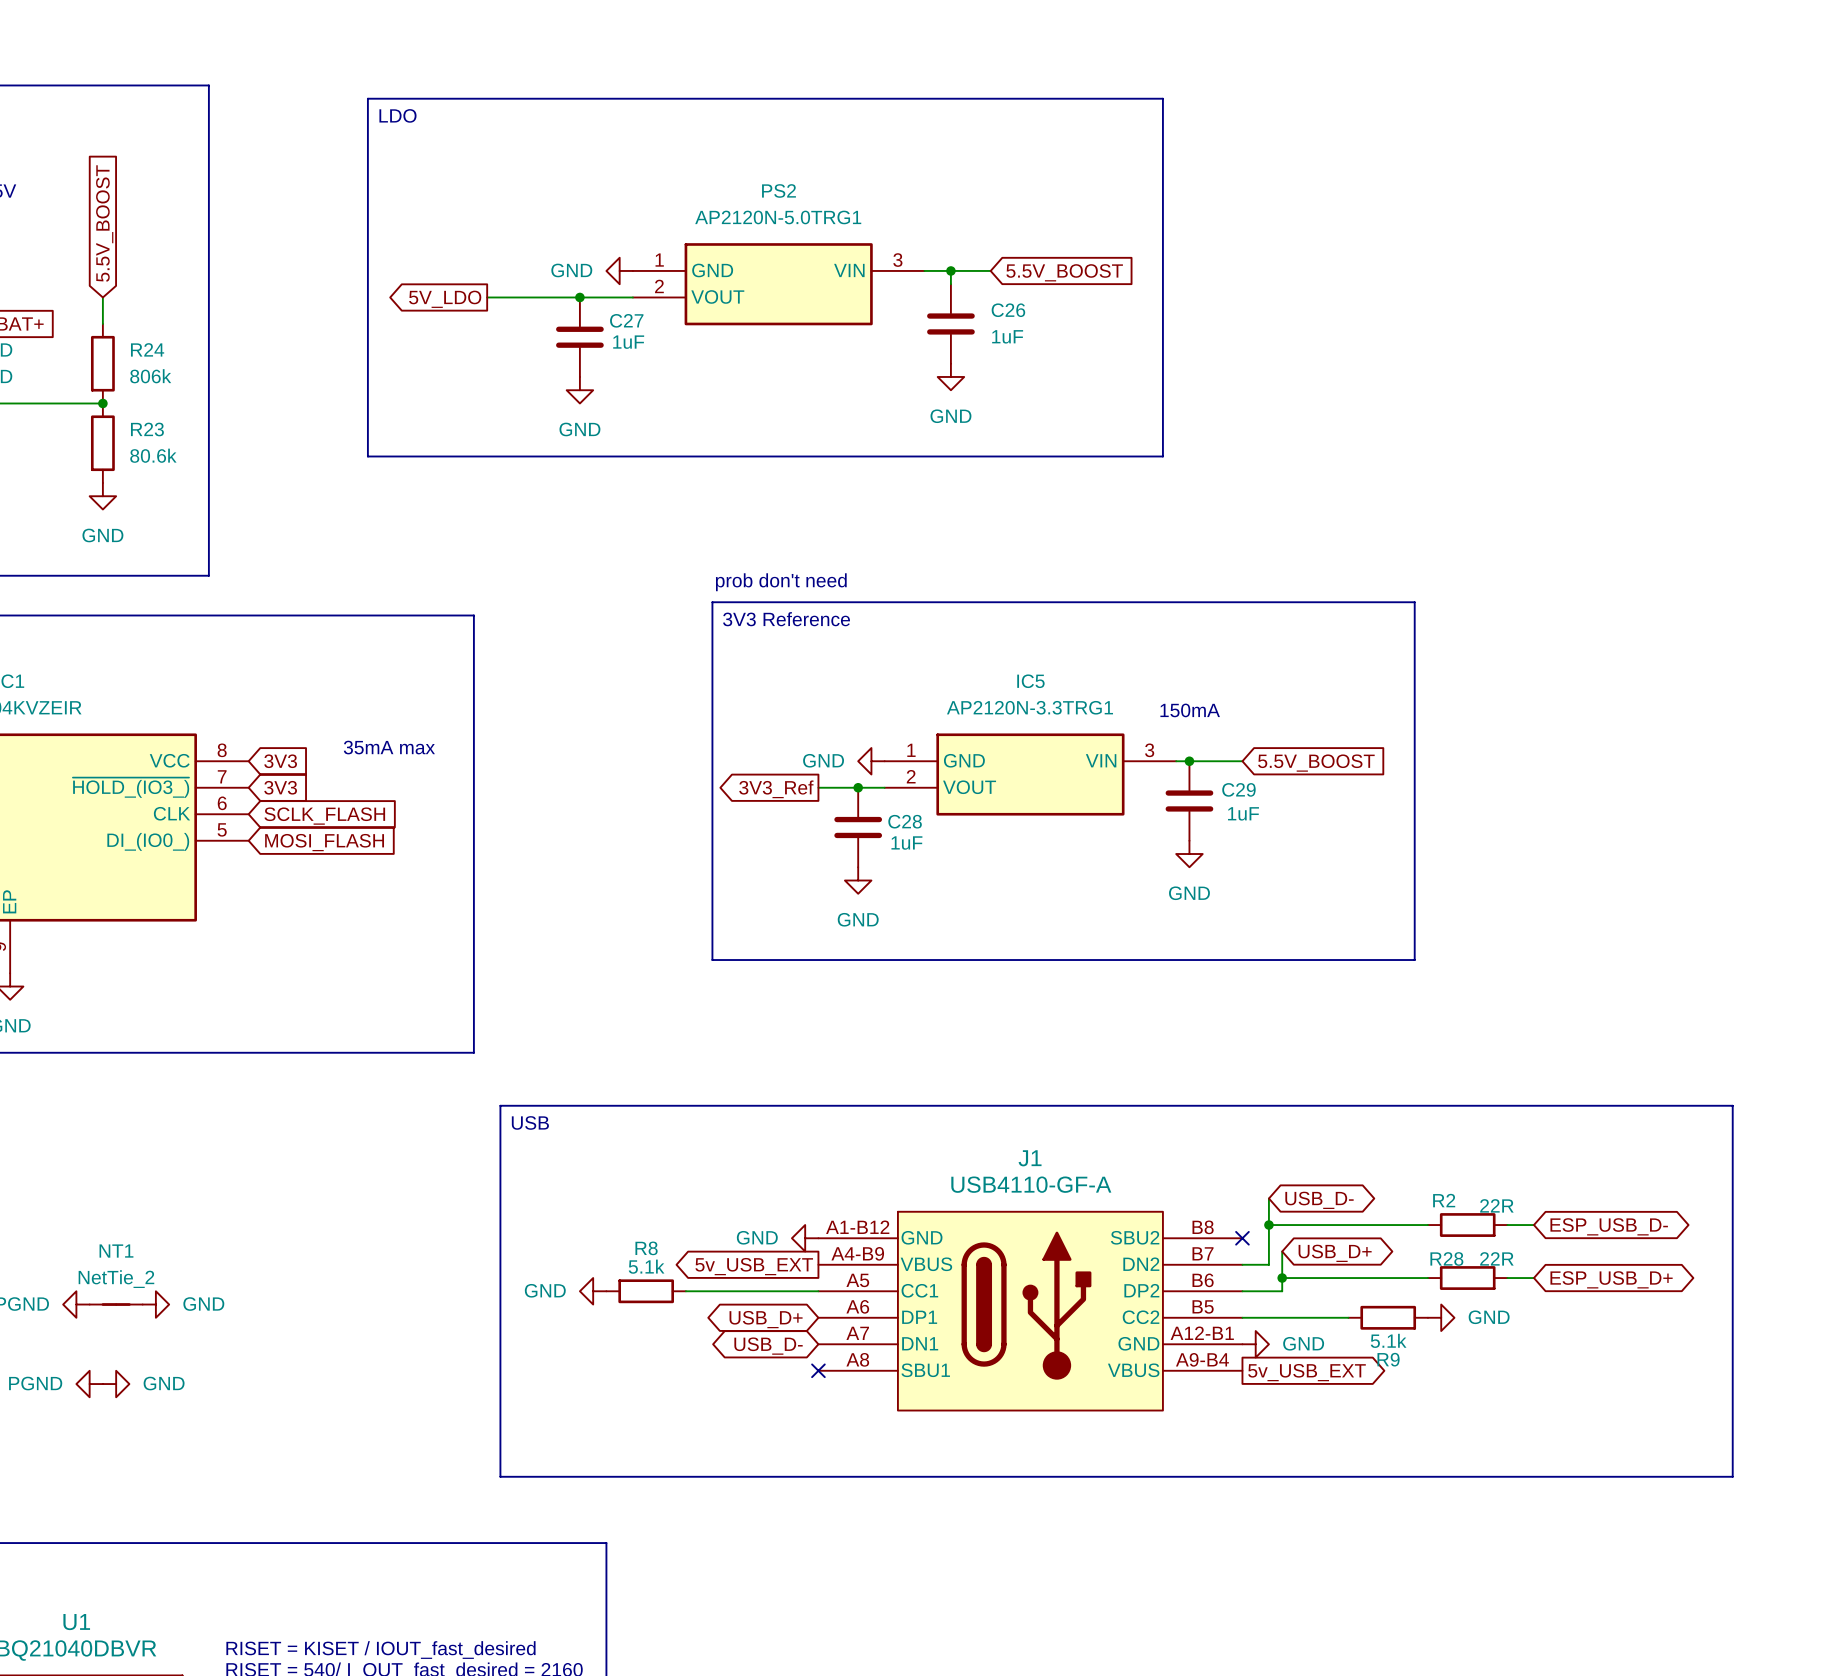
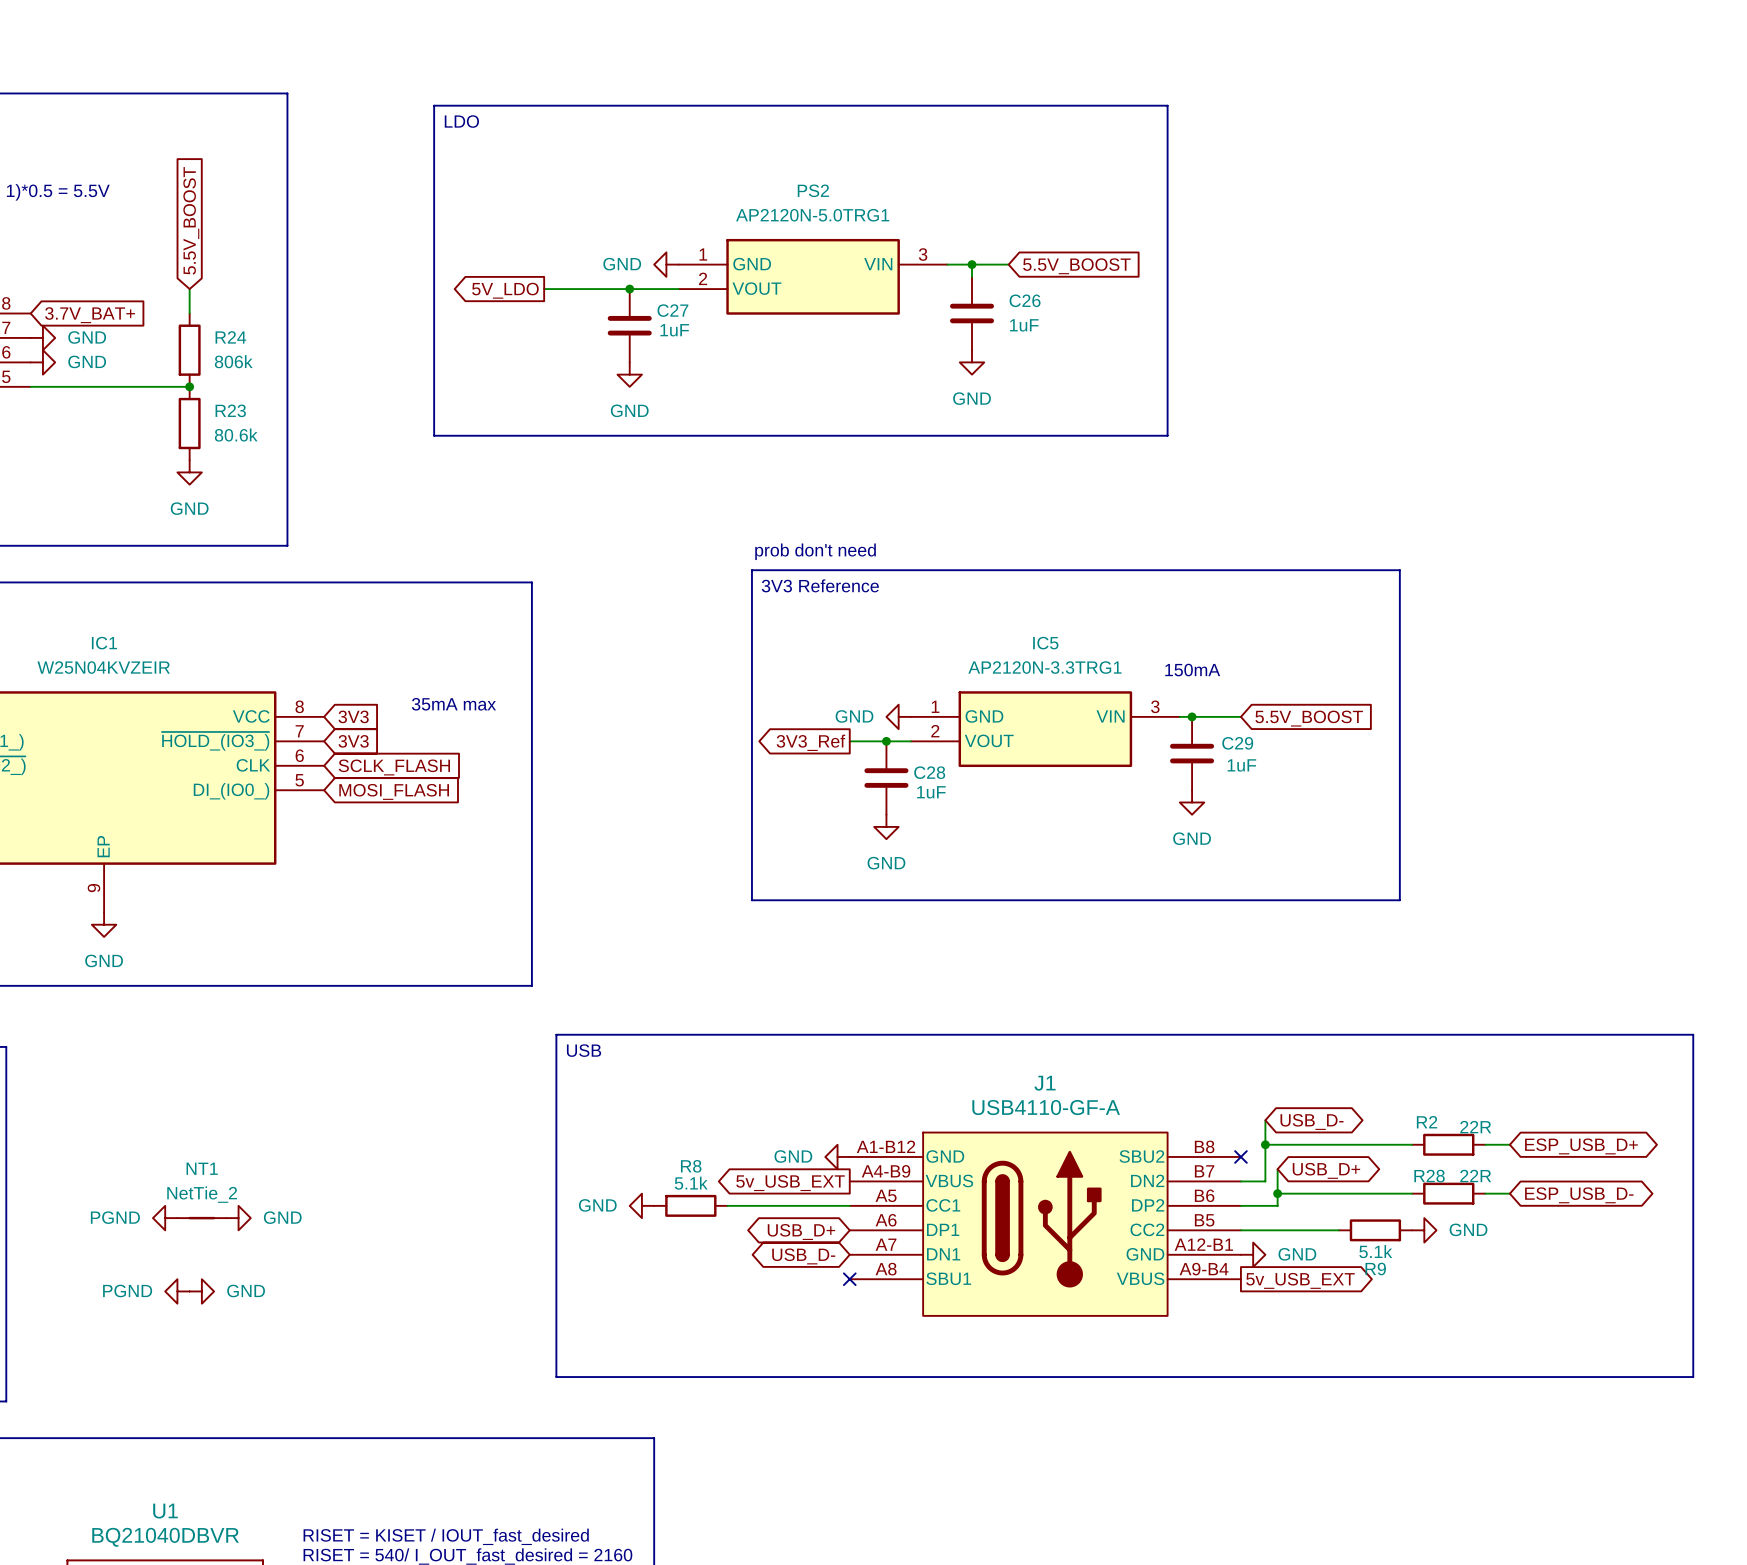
global label: ESP_USB_D- (1609, 1226) -> ESP_USB_D+ (1581, 1146)
global label: ESP_USB_D+ (1611, 1279) -> ESP_USB_D- (1579, 1195)

